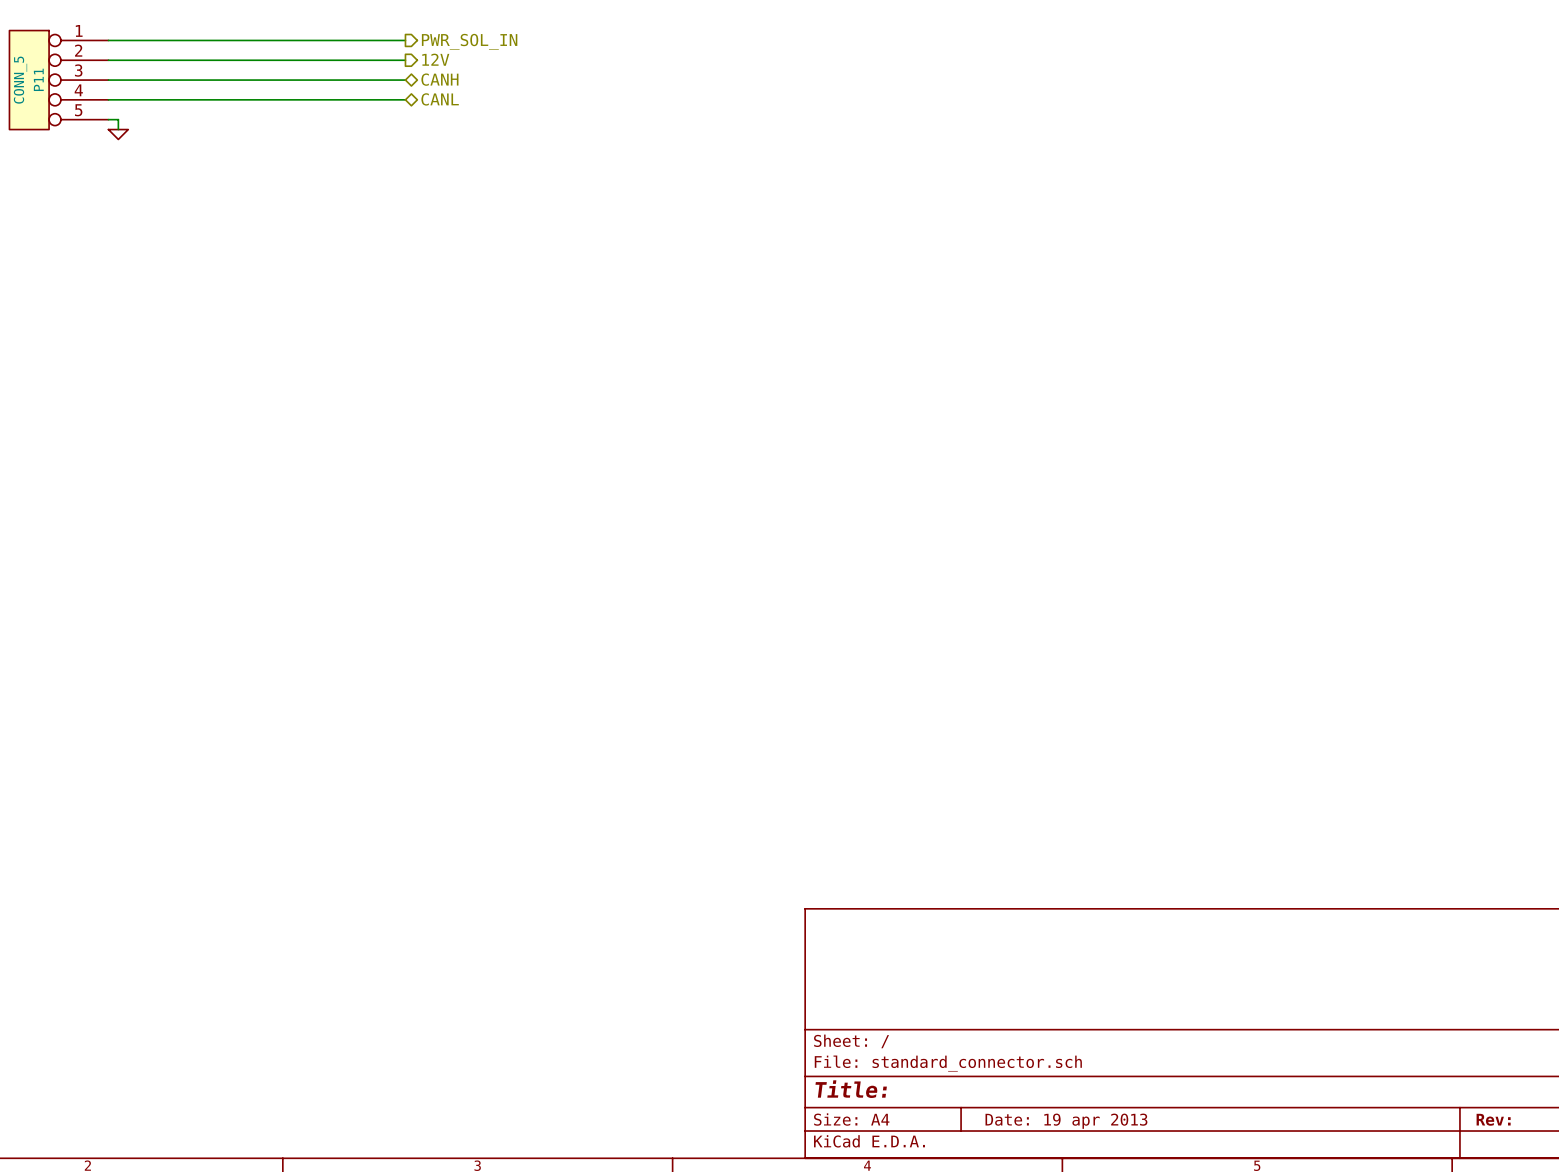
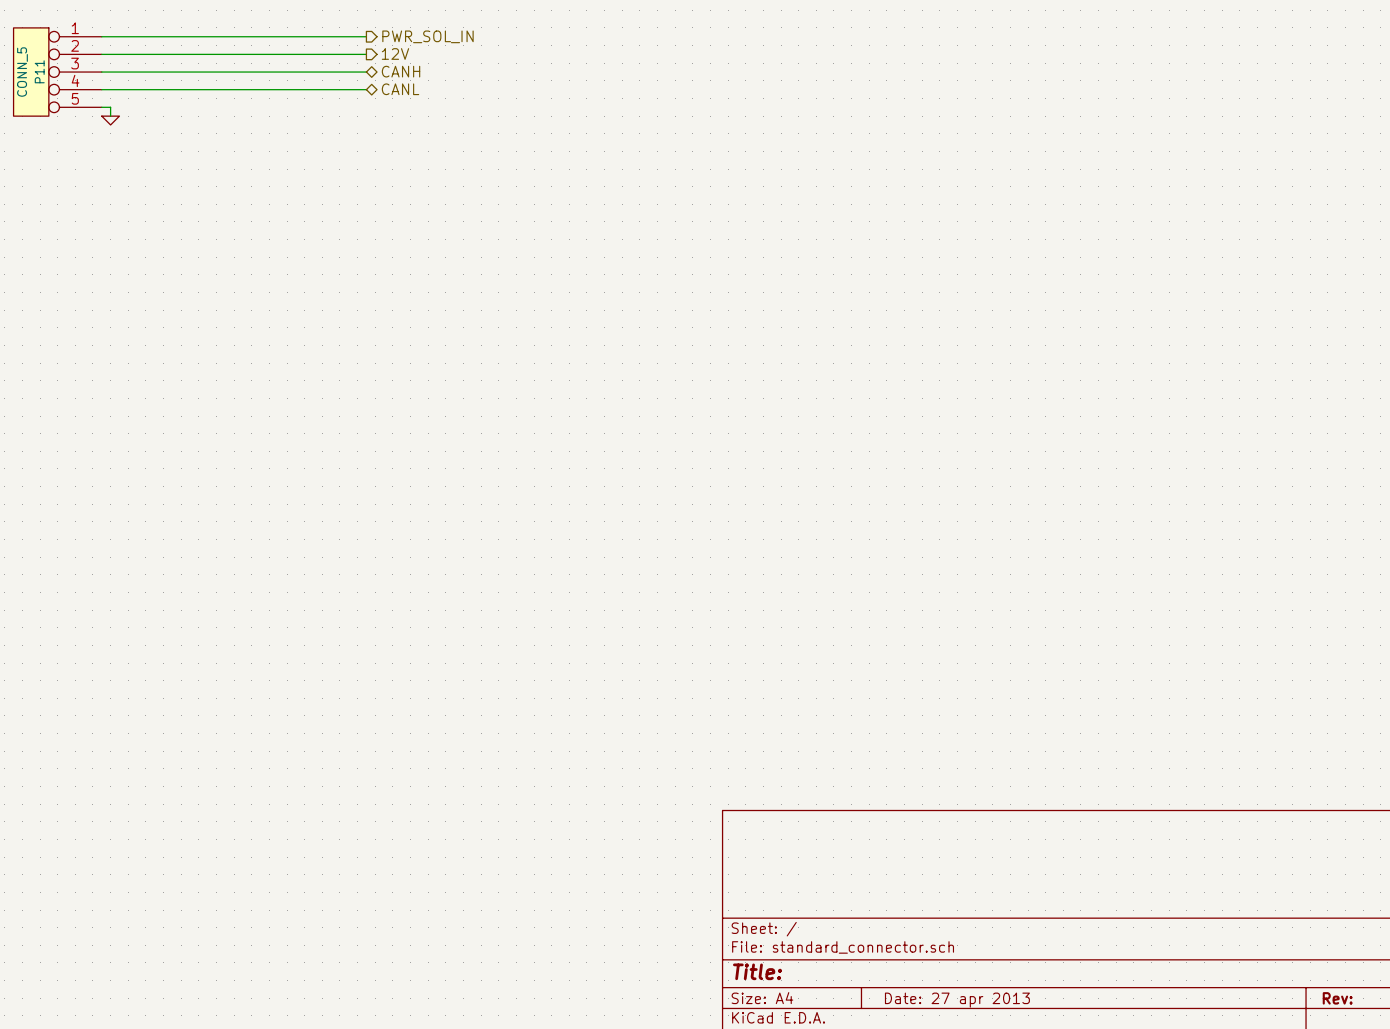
title block: Date: 19 apr 2013 (1066, 1121) -> Date: 27 apr 2013 (957, 1000)

